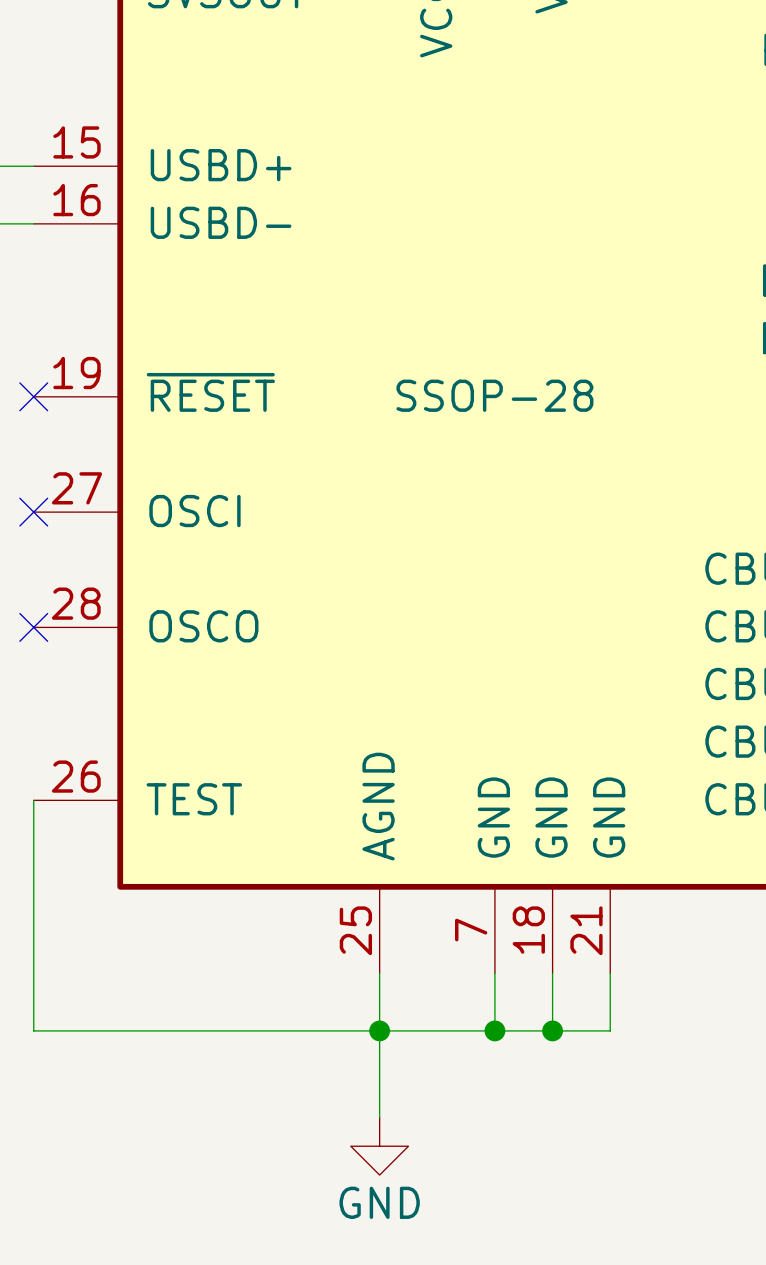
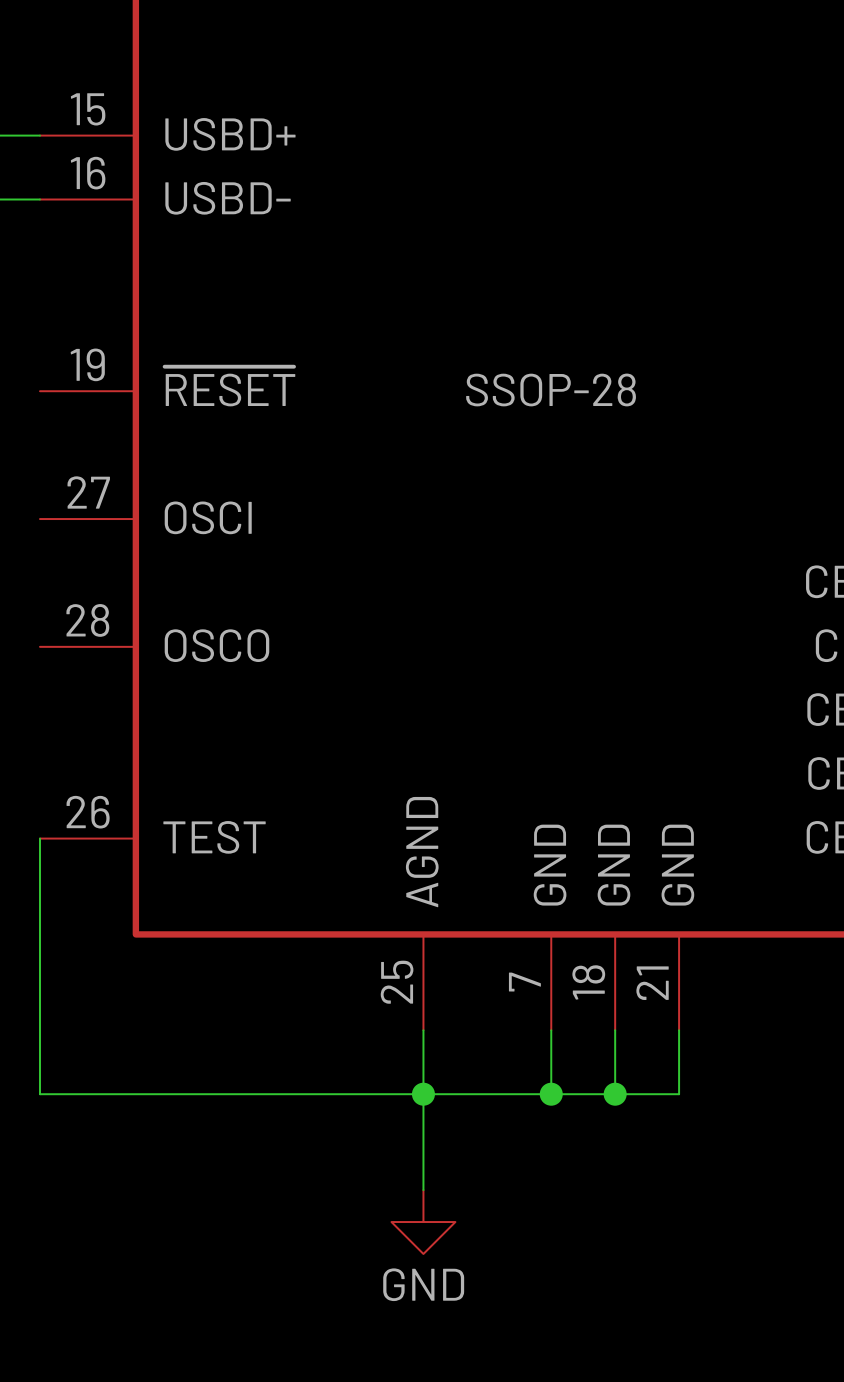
no-connect mark: (33, 396) -> none
no-connect mark: (33, 512) -> none
no-connect mark: (33, 627) -> none

